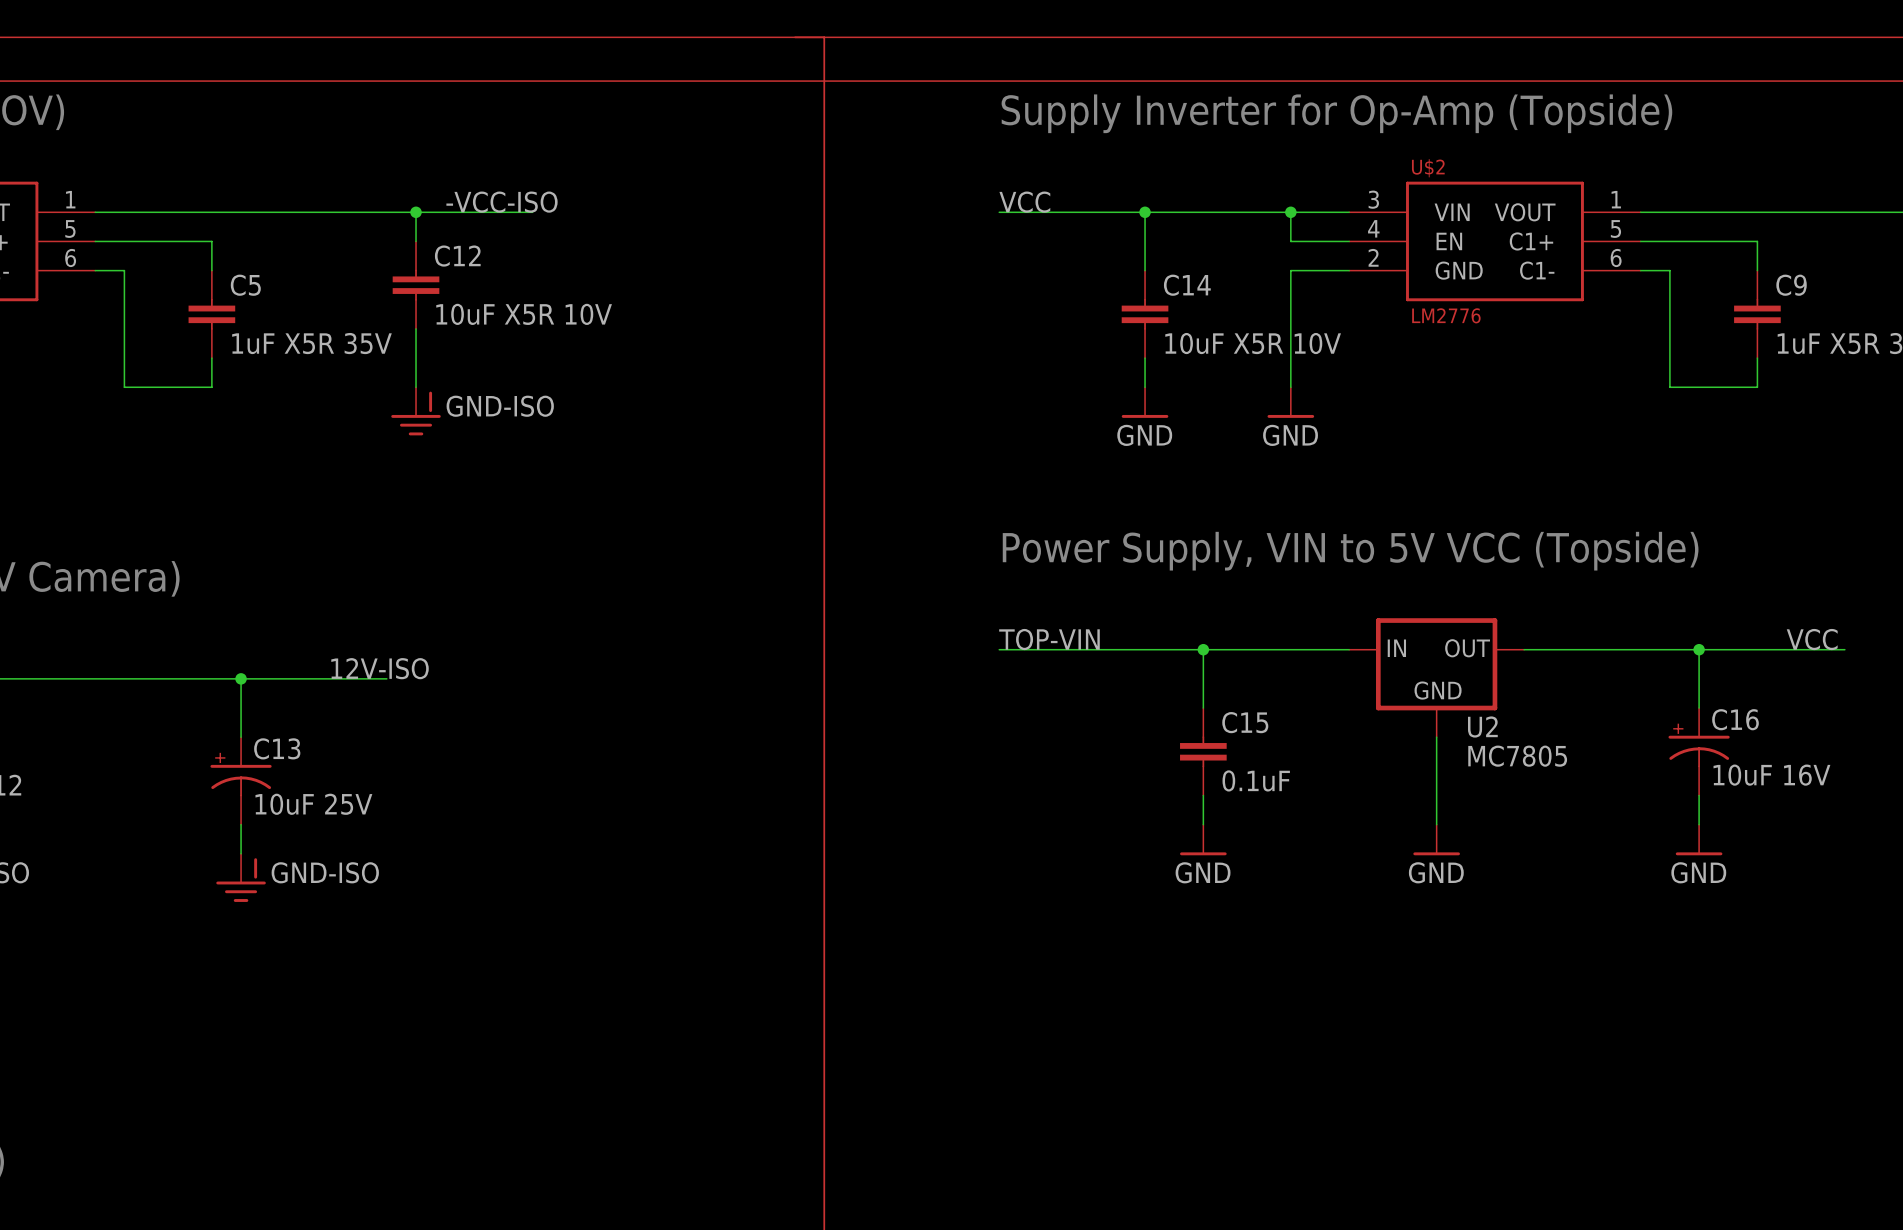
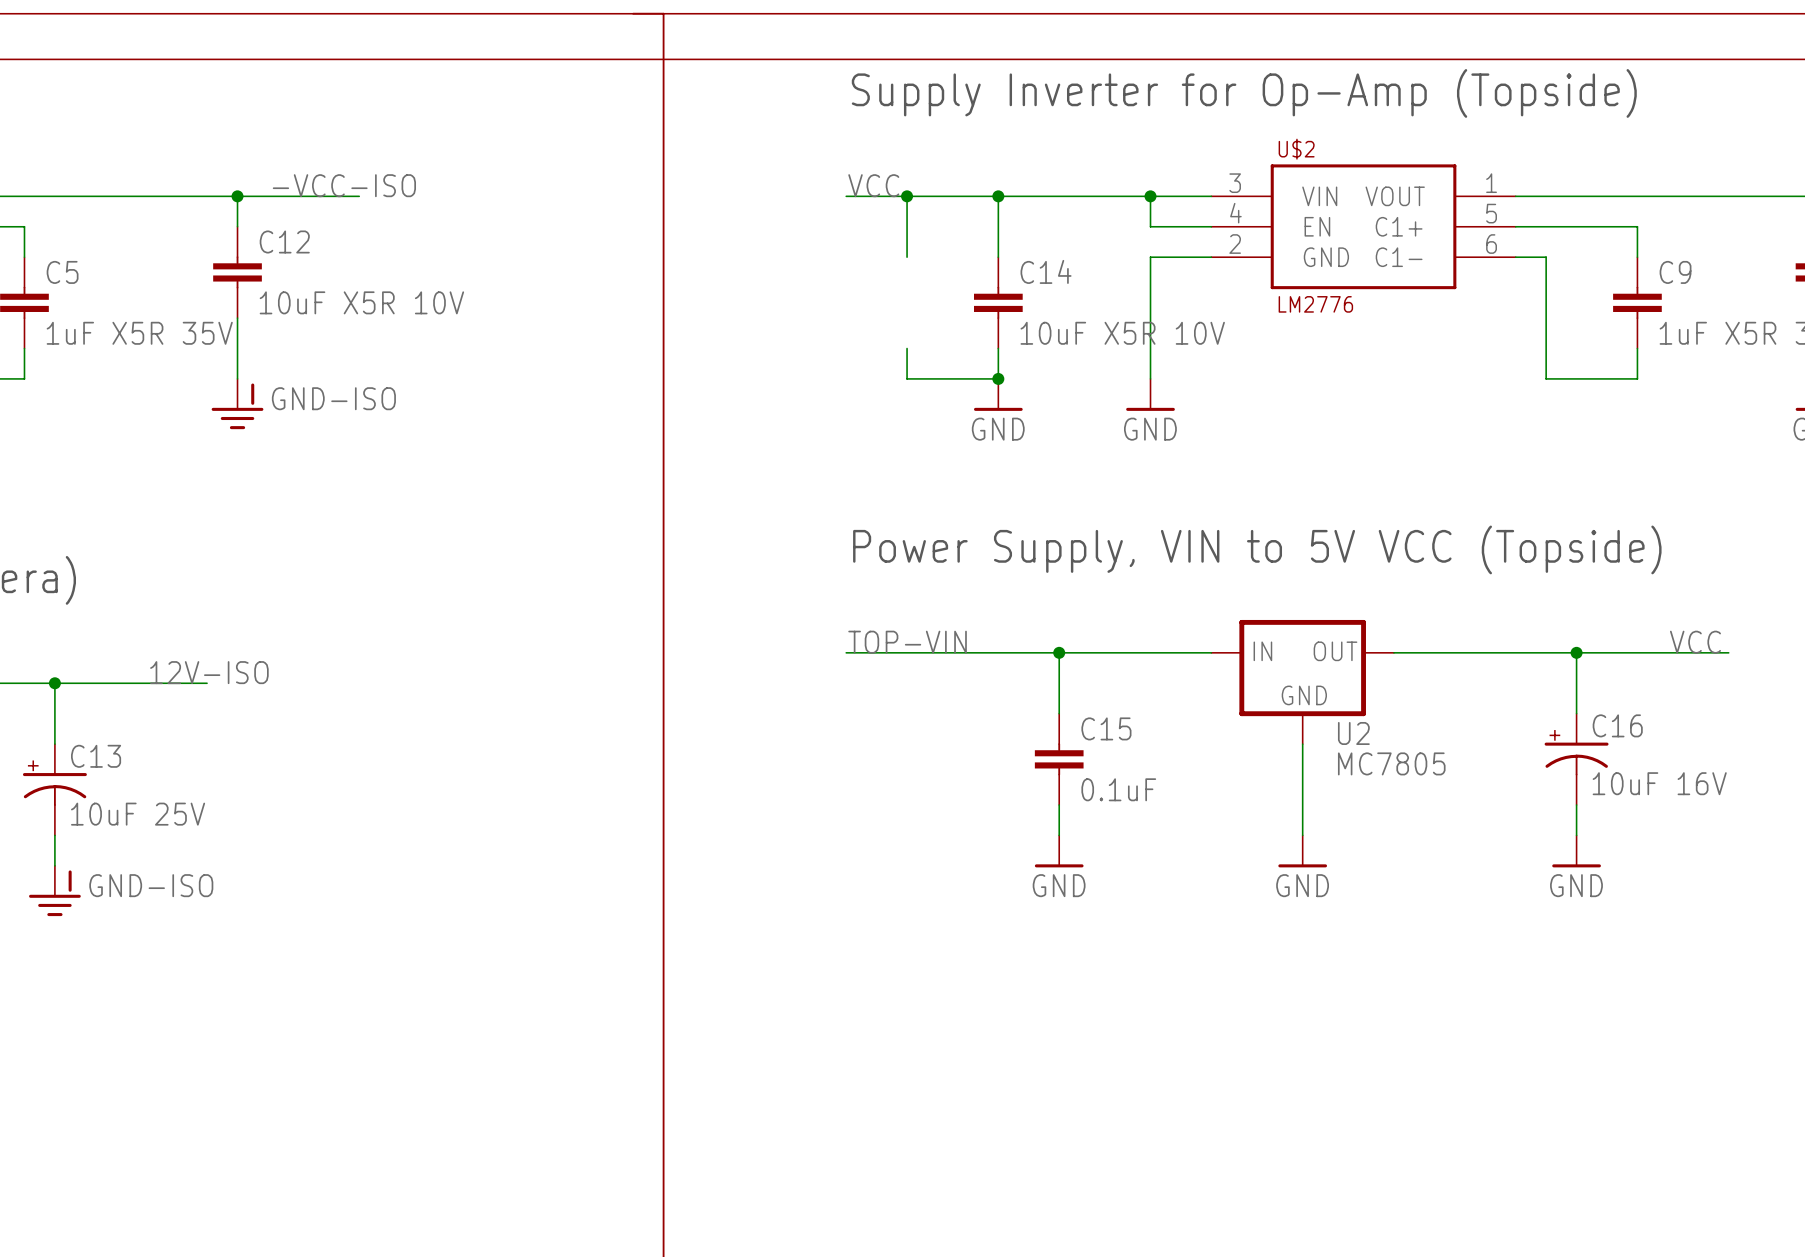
wire: none -> (907, 196) (907, 257)
junction: none -> (907, 196)
wire: none -> (907, 348) (907, 378) (998, 378)
junction: none -> (998, 378)

